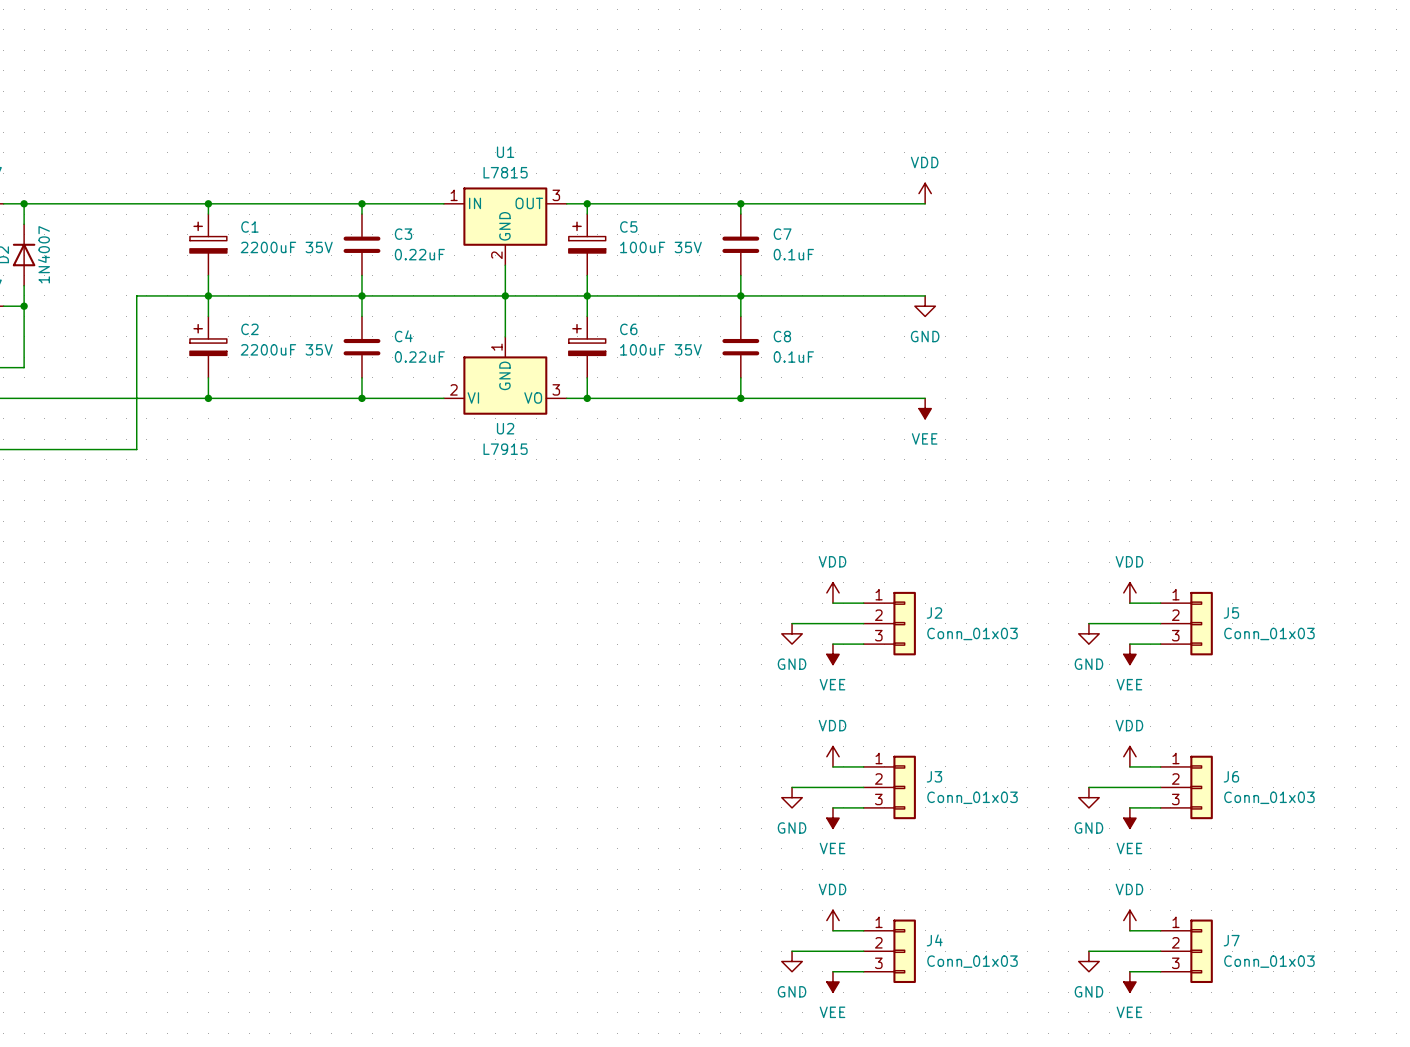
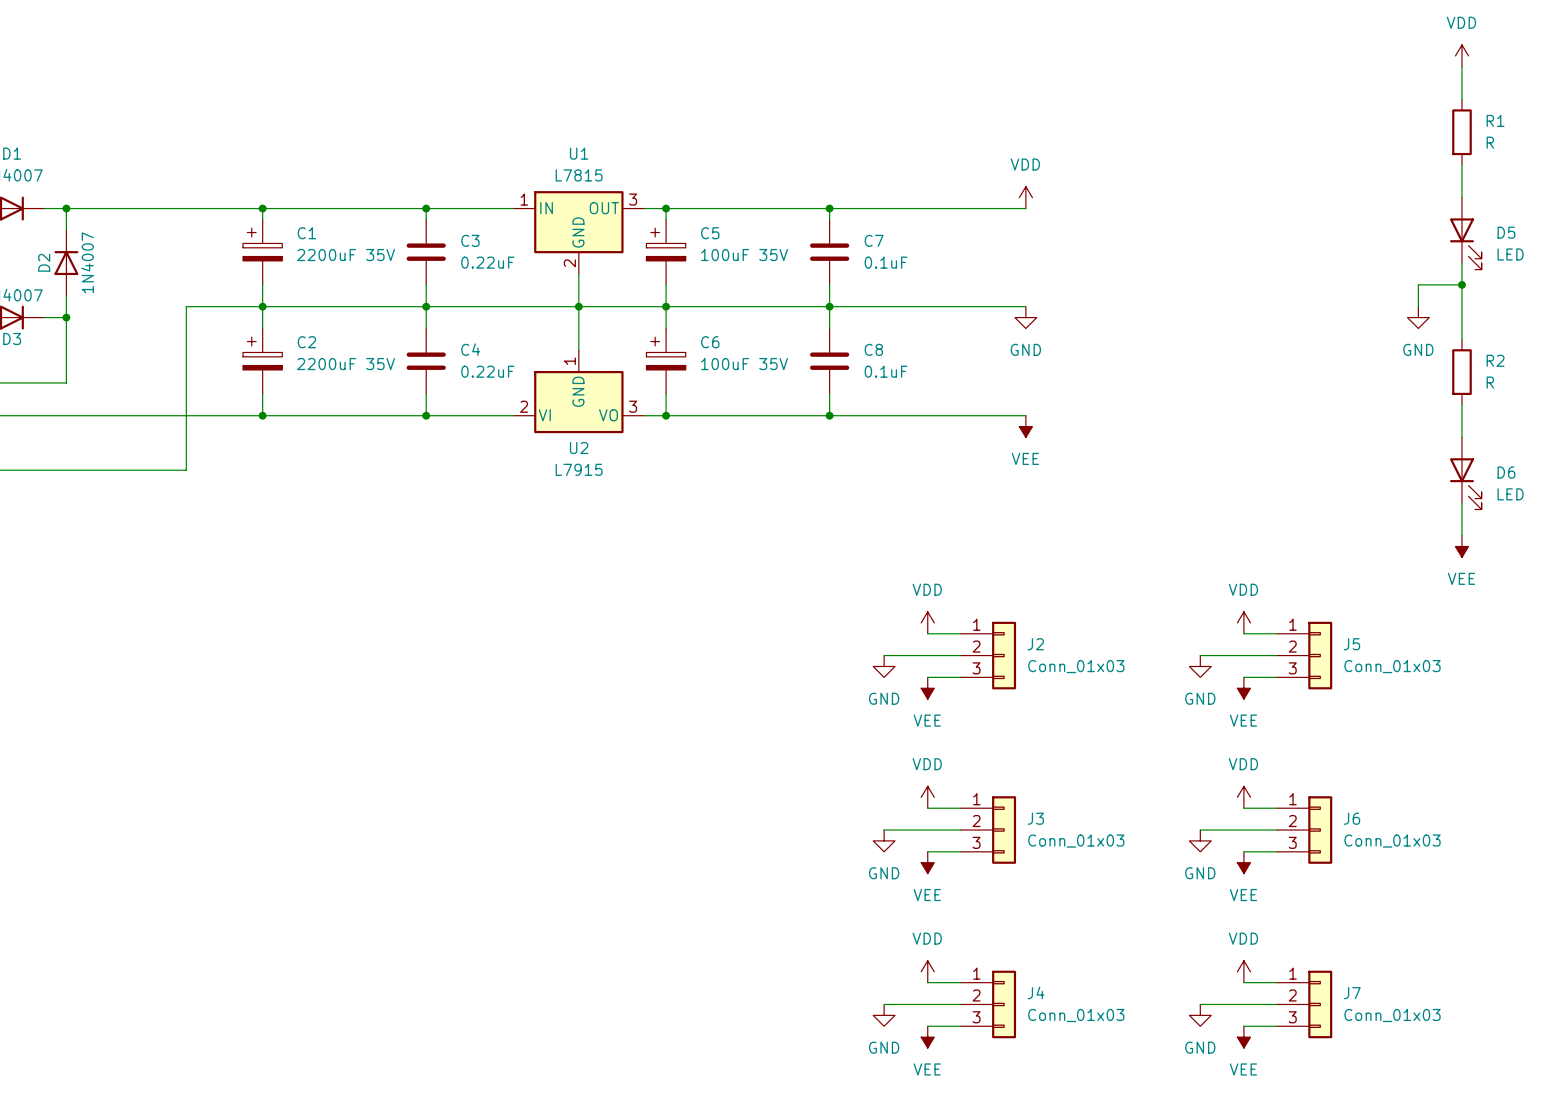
power symbol: none -> VDD (1461, 55)
wire: none -> (1461, 66) (1461, 99)
R1: none -> R (1461, 132)
wire: none -> (1461, 164) (1461, 197)
D5: none -> LED (1465, 233)
wire: none -> (1461, 263) (1461, 339)
wire: none -> (1461, 284) (1418, 284) (1418, 306)
junction: none -> (1461, 284)
power symbol: none -> GND (1418, 317)
R2: none -> R (1461, 372)
wire: none -> (1461, 404) (1461, 437)
D6: none -> LED (1465, 473)
wire: none -> (1461, 502) (1461, 535)
power symbol: none -> VEE (1461, 546)

